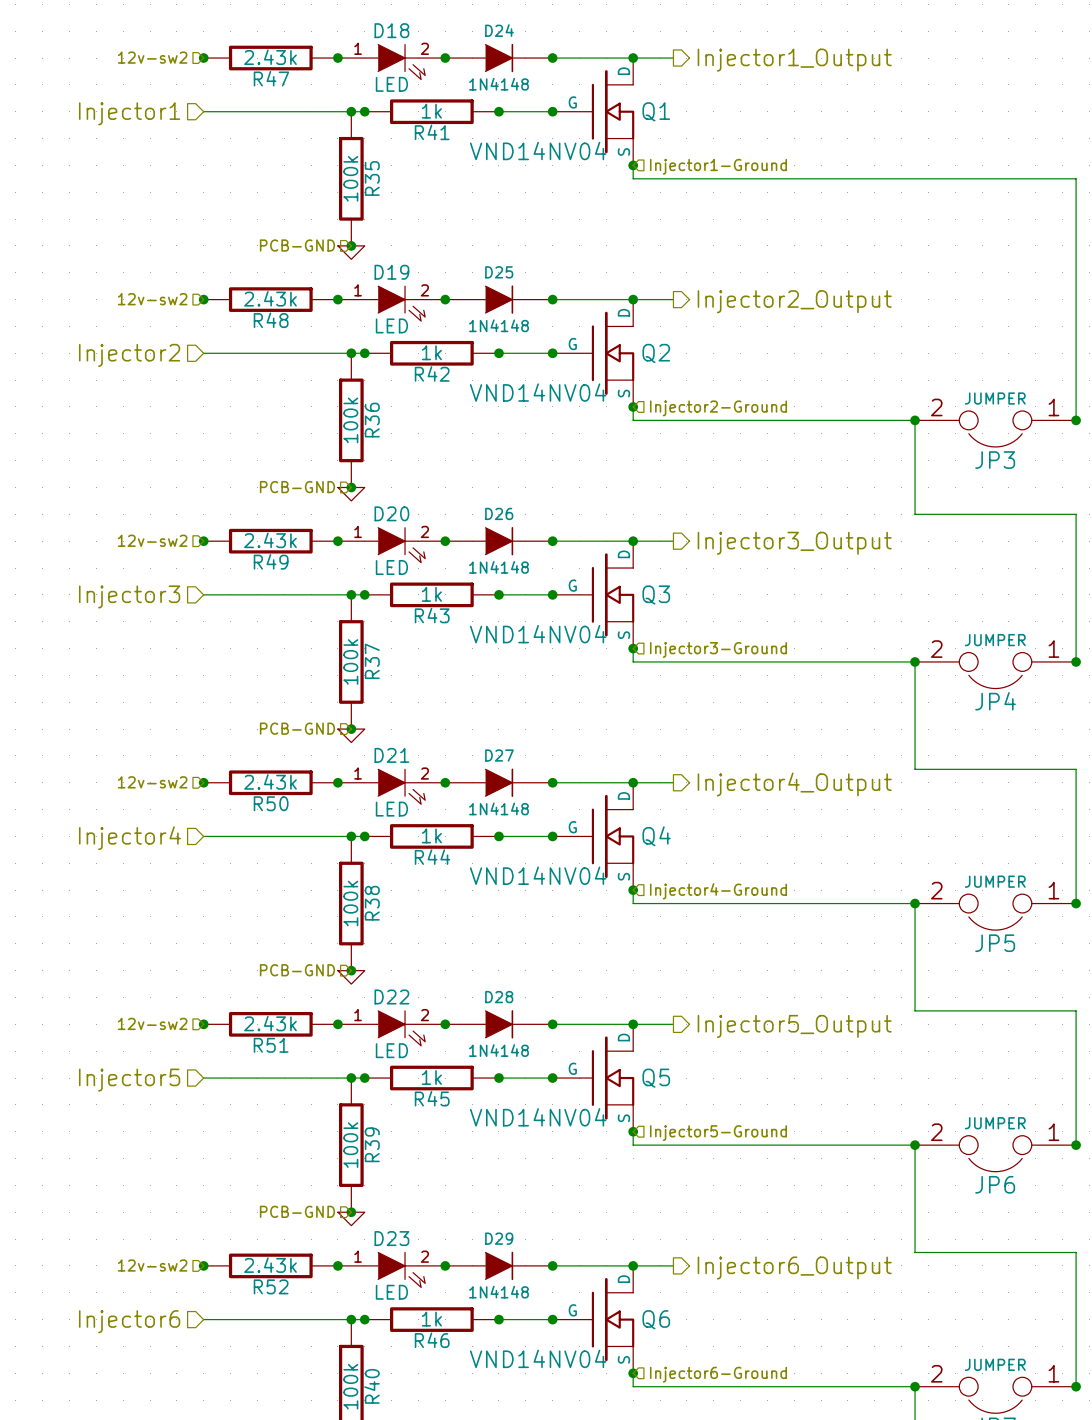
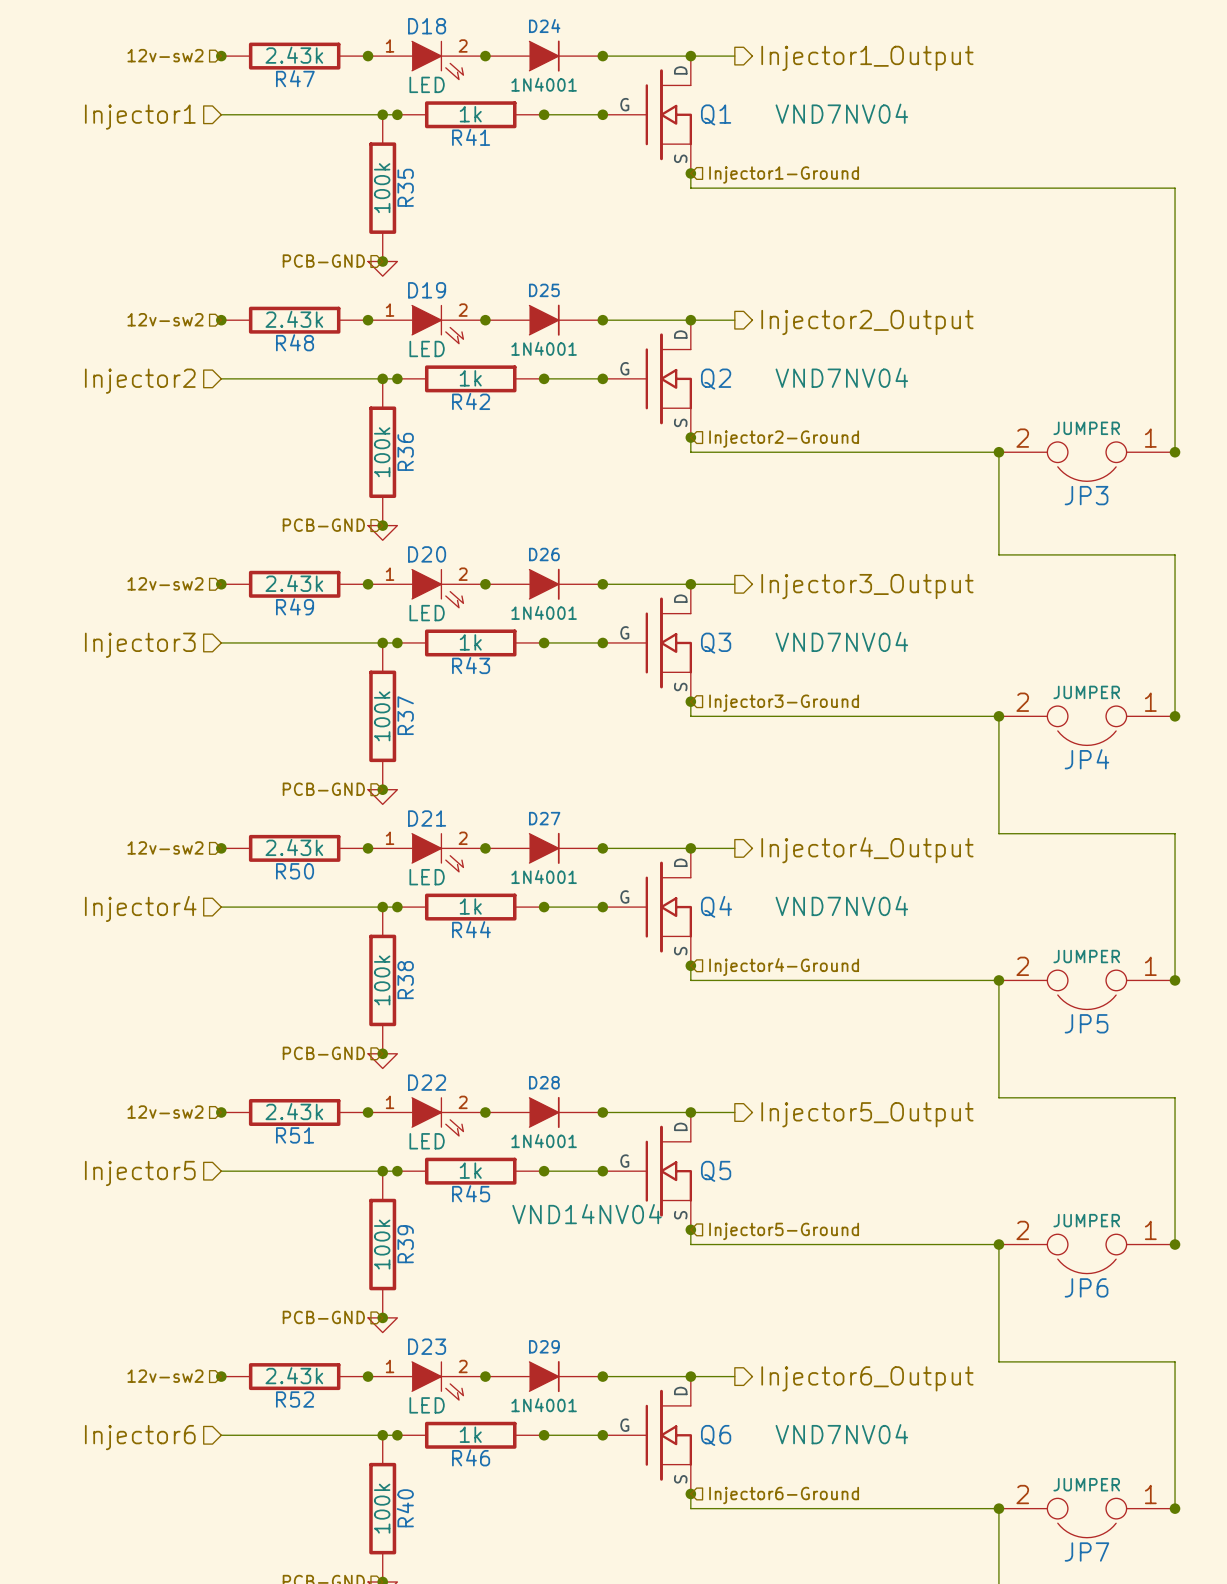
D24 value: 1N4148 (498, 84) -> 1N4001 (544, 84)
Q1 value: VND14NV04 (538, 150) -> VND7NV04 (841, 113)
D25 value: 1N4148 (498, 325) -> 1N4001 (544, 348)
Q2 value: VND14NV04 (538, 392) -> VND7NV04 (841, 377)
D26 value: 1N4148 (498, 567) -> 1N4001 (544, 612)
Q3 value: VND14NV04 (538, 634) -> VND7NV04 (841, 641)
D27 value: 1N4148 (498, 808) -> 1N4001 (544, 877)
Q4 value: VND14NV04 (538, 875) -> VND7NV04 (841, 906)
D28 value: 1N4148 (498, 1050) -> 1N4001 (544, 1141)
D29 value: 1N4148 (498, 1292) -> 1N4001 (544, 1405)
Q6 value: VND14NV04 (538, 1358) -> VND7NV04 (841, 1434)

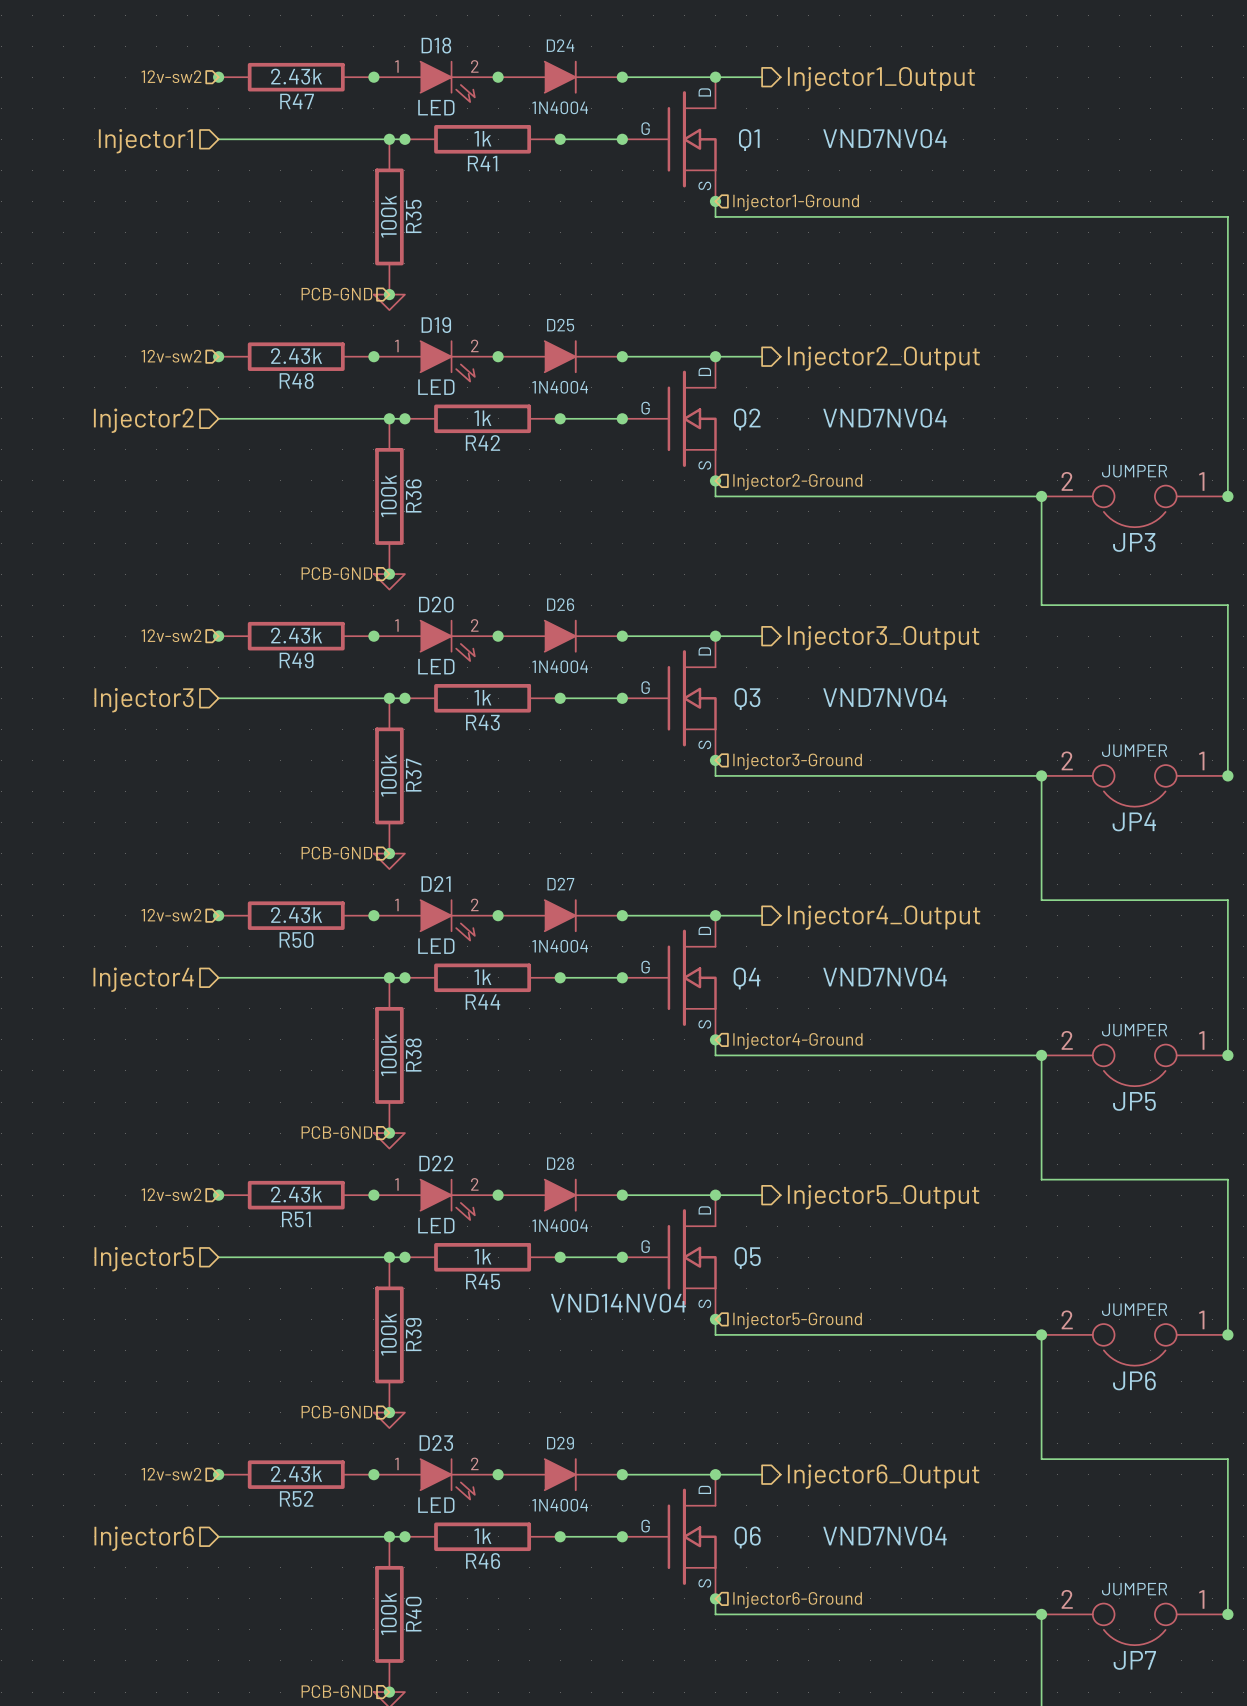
D24 value: 1N4001 (544, 84) -> 1N4004 (560, 107)
D25 value: 1N4001 (544, 348) -> 1N4004 (560, 387)
D26 value: 1N4001 (544, 612) -> 1N4004 (560, 666)
D27 value: 1N4001 (544, 877) -> 1N4004 (560, 946)
D28 value: 1N4001 (544, 1141) -> 1N4004 (560, 1225)
D29 value: 1N4001 (544, 1405) -> 1N4004 (560, 1505)

